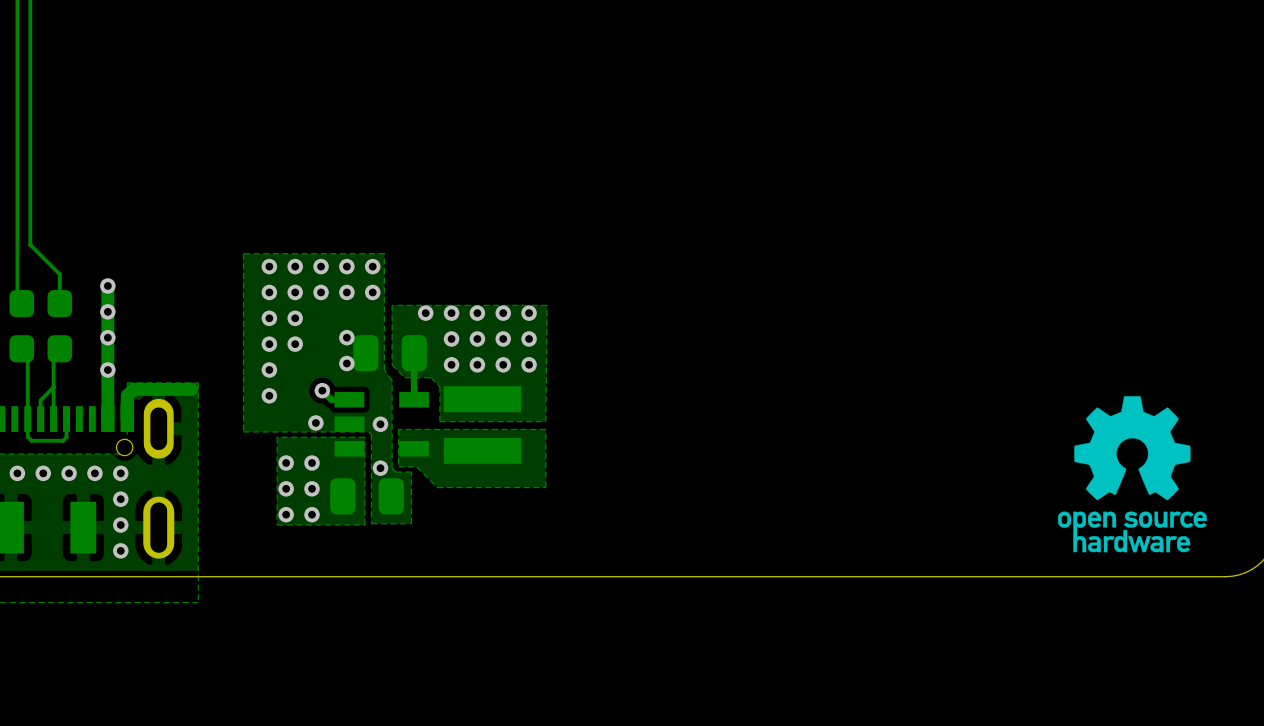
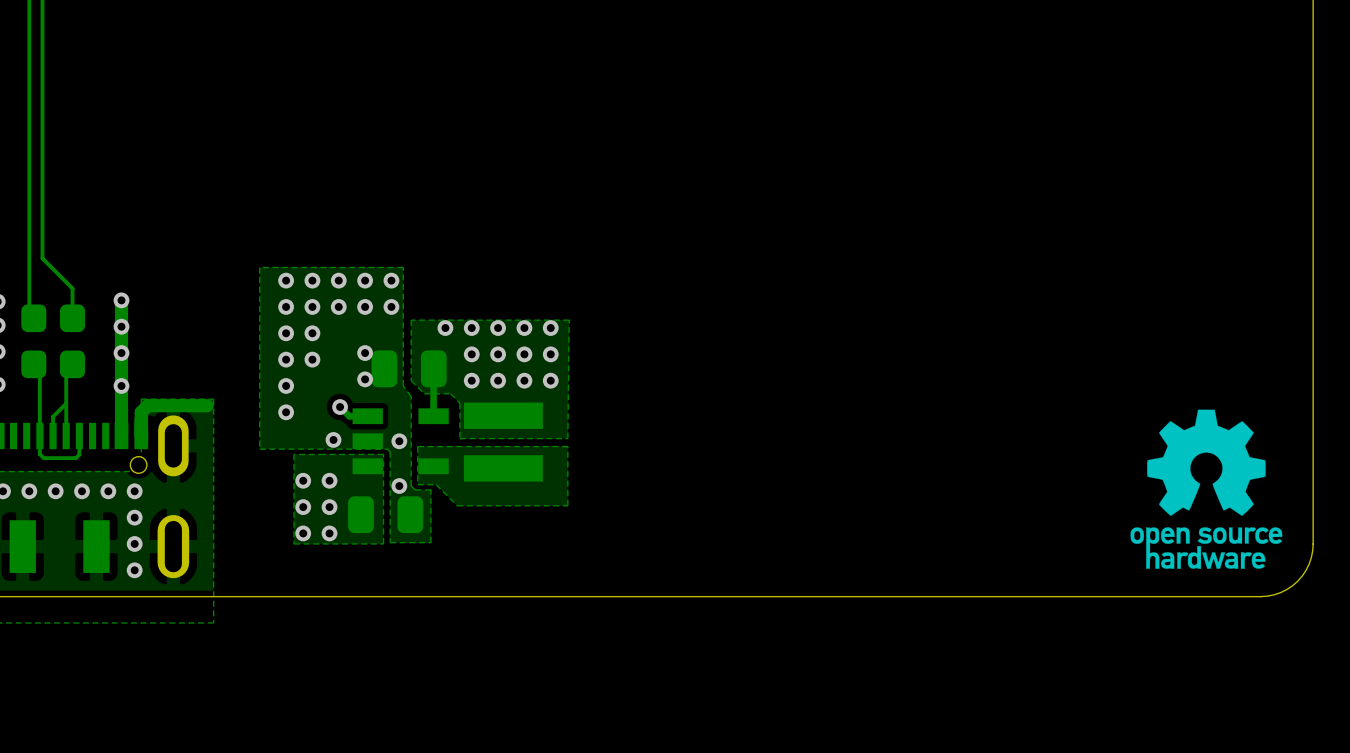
drawing position: (1132, 474) -> (1206, 489)

